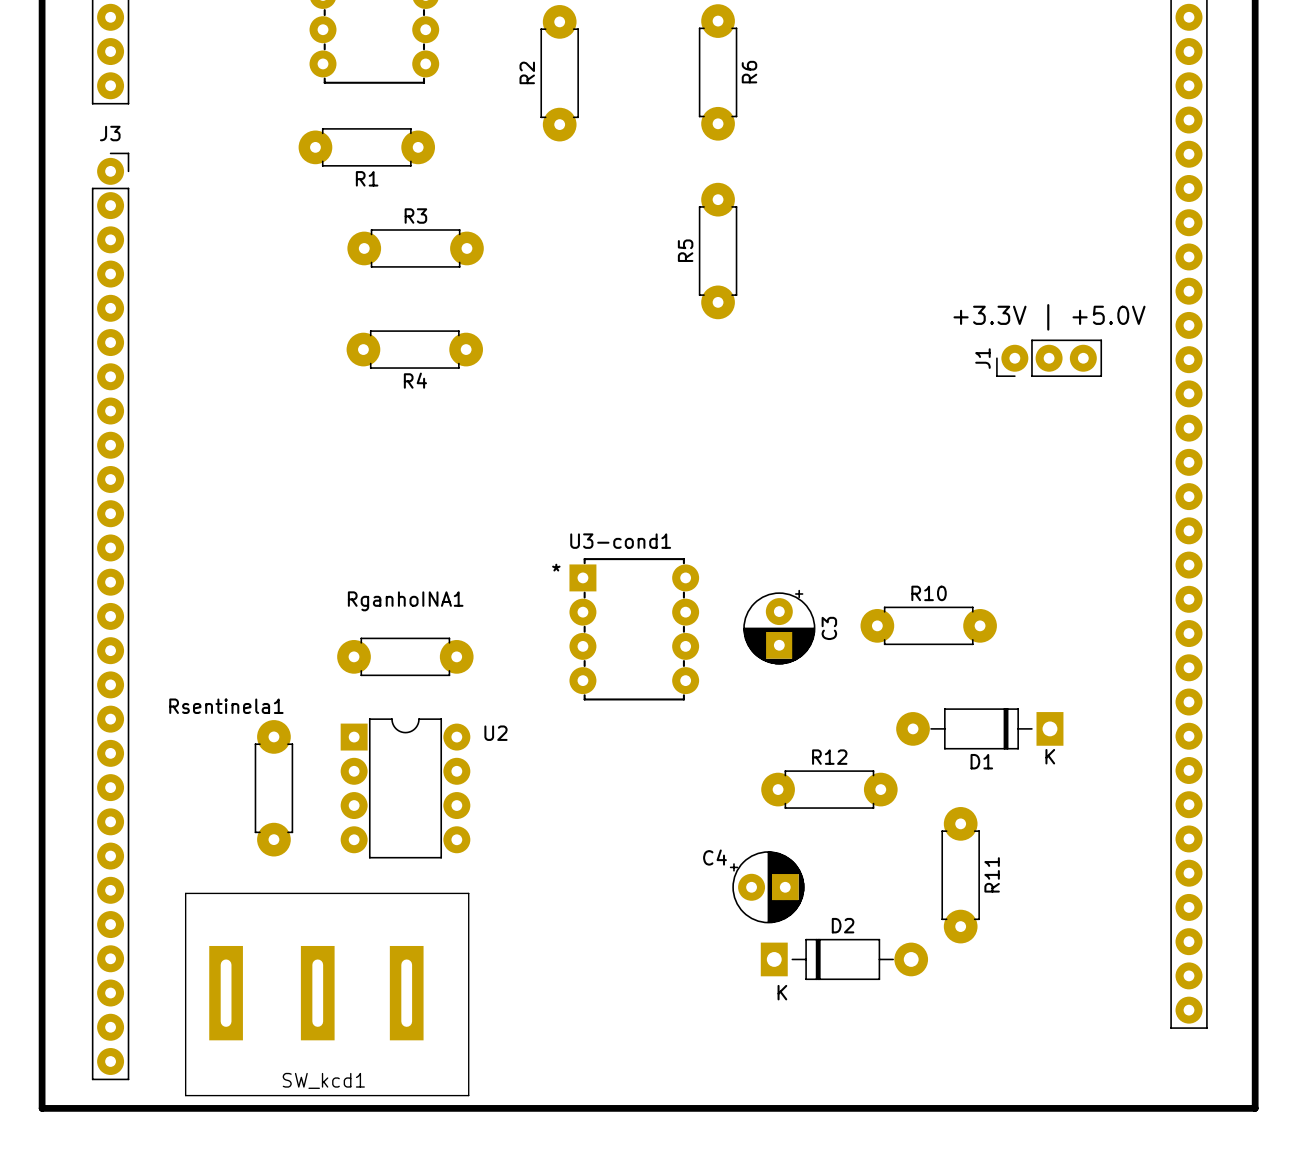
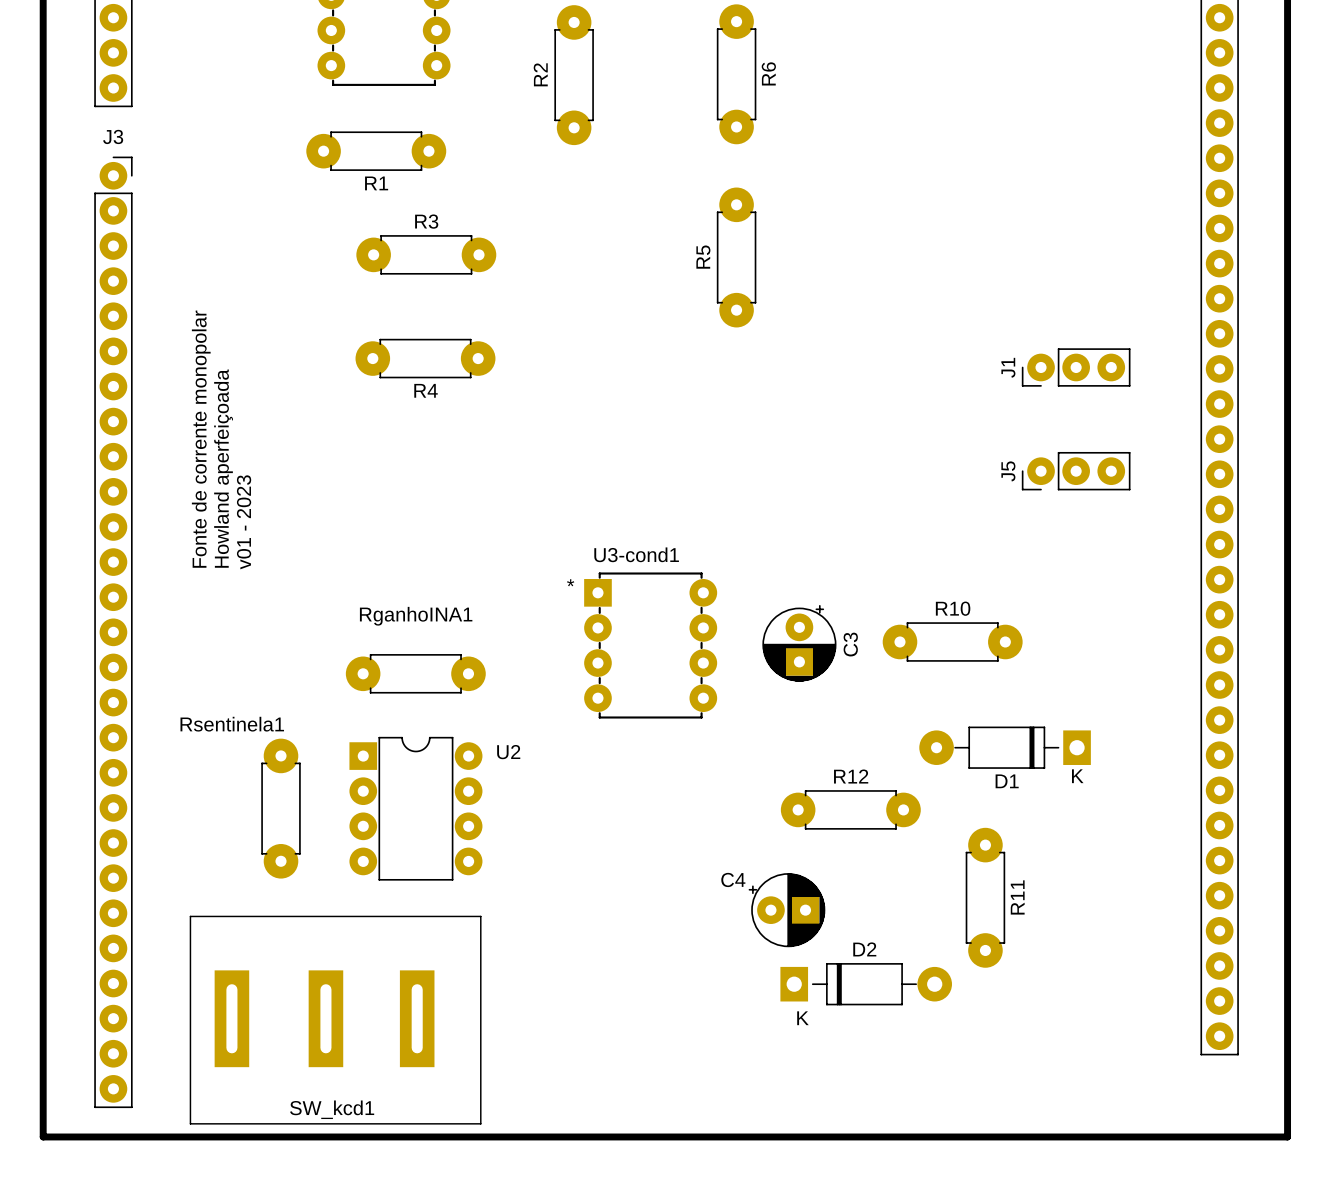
text: +3.3V | +5.0V (1049, 317) -> none
text: none -> Fonte de corrente monopolar (201, 439)
text: none -> Howland aperfeiçoada (223, 468)
J5: none -> (1076, 471)
text: none -> v01 - 2023 (244, 522)

